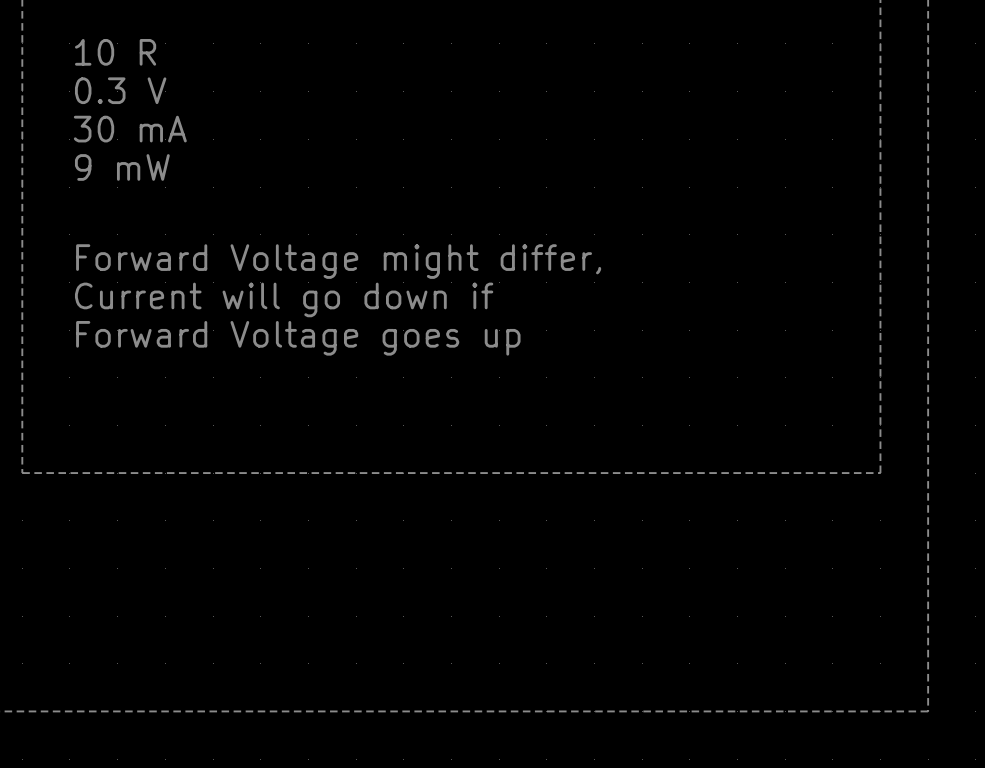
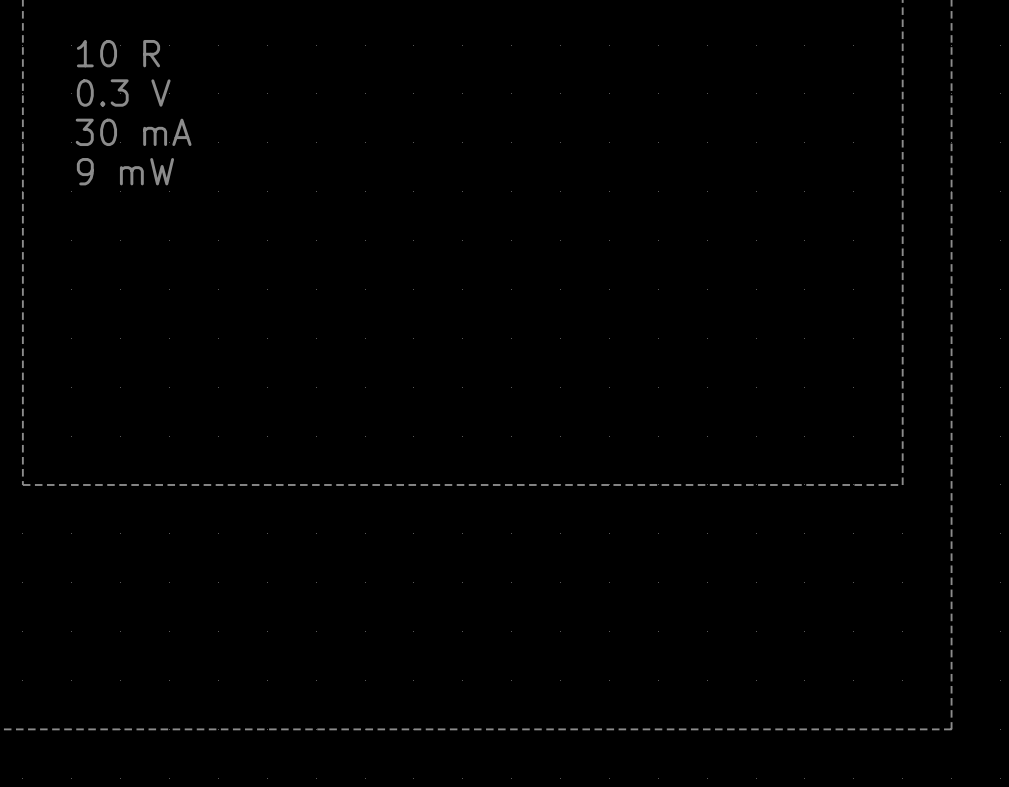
text: Forward Voltage might differ, (338, 261) -> none
text: Current will go down if (284, 299) -> none
text: Forward Voltage goes up (298, 338) -> none

